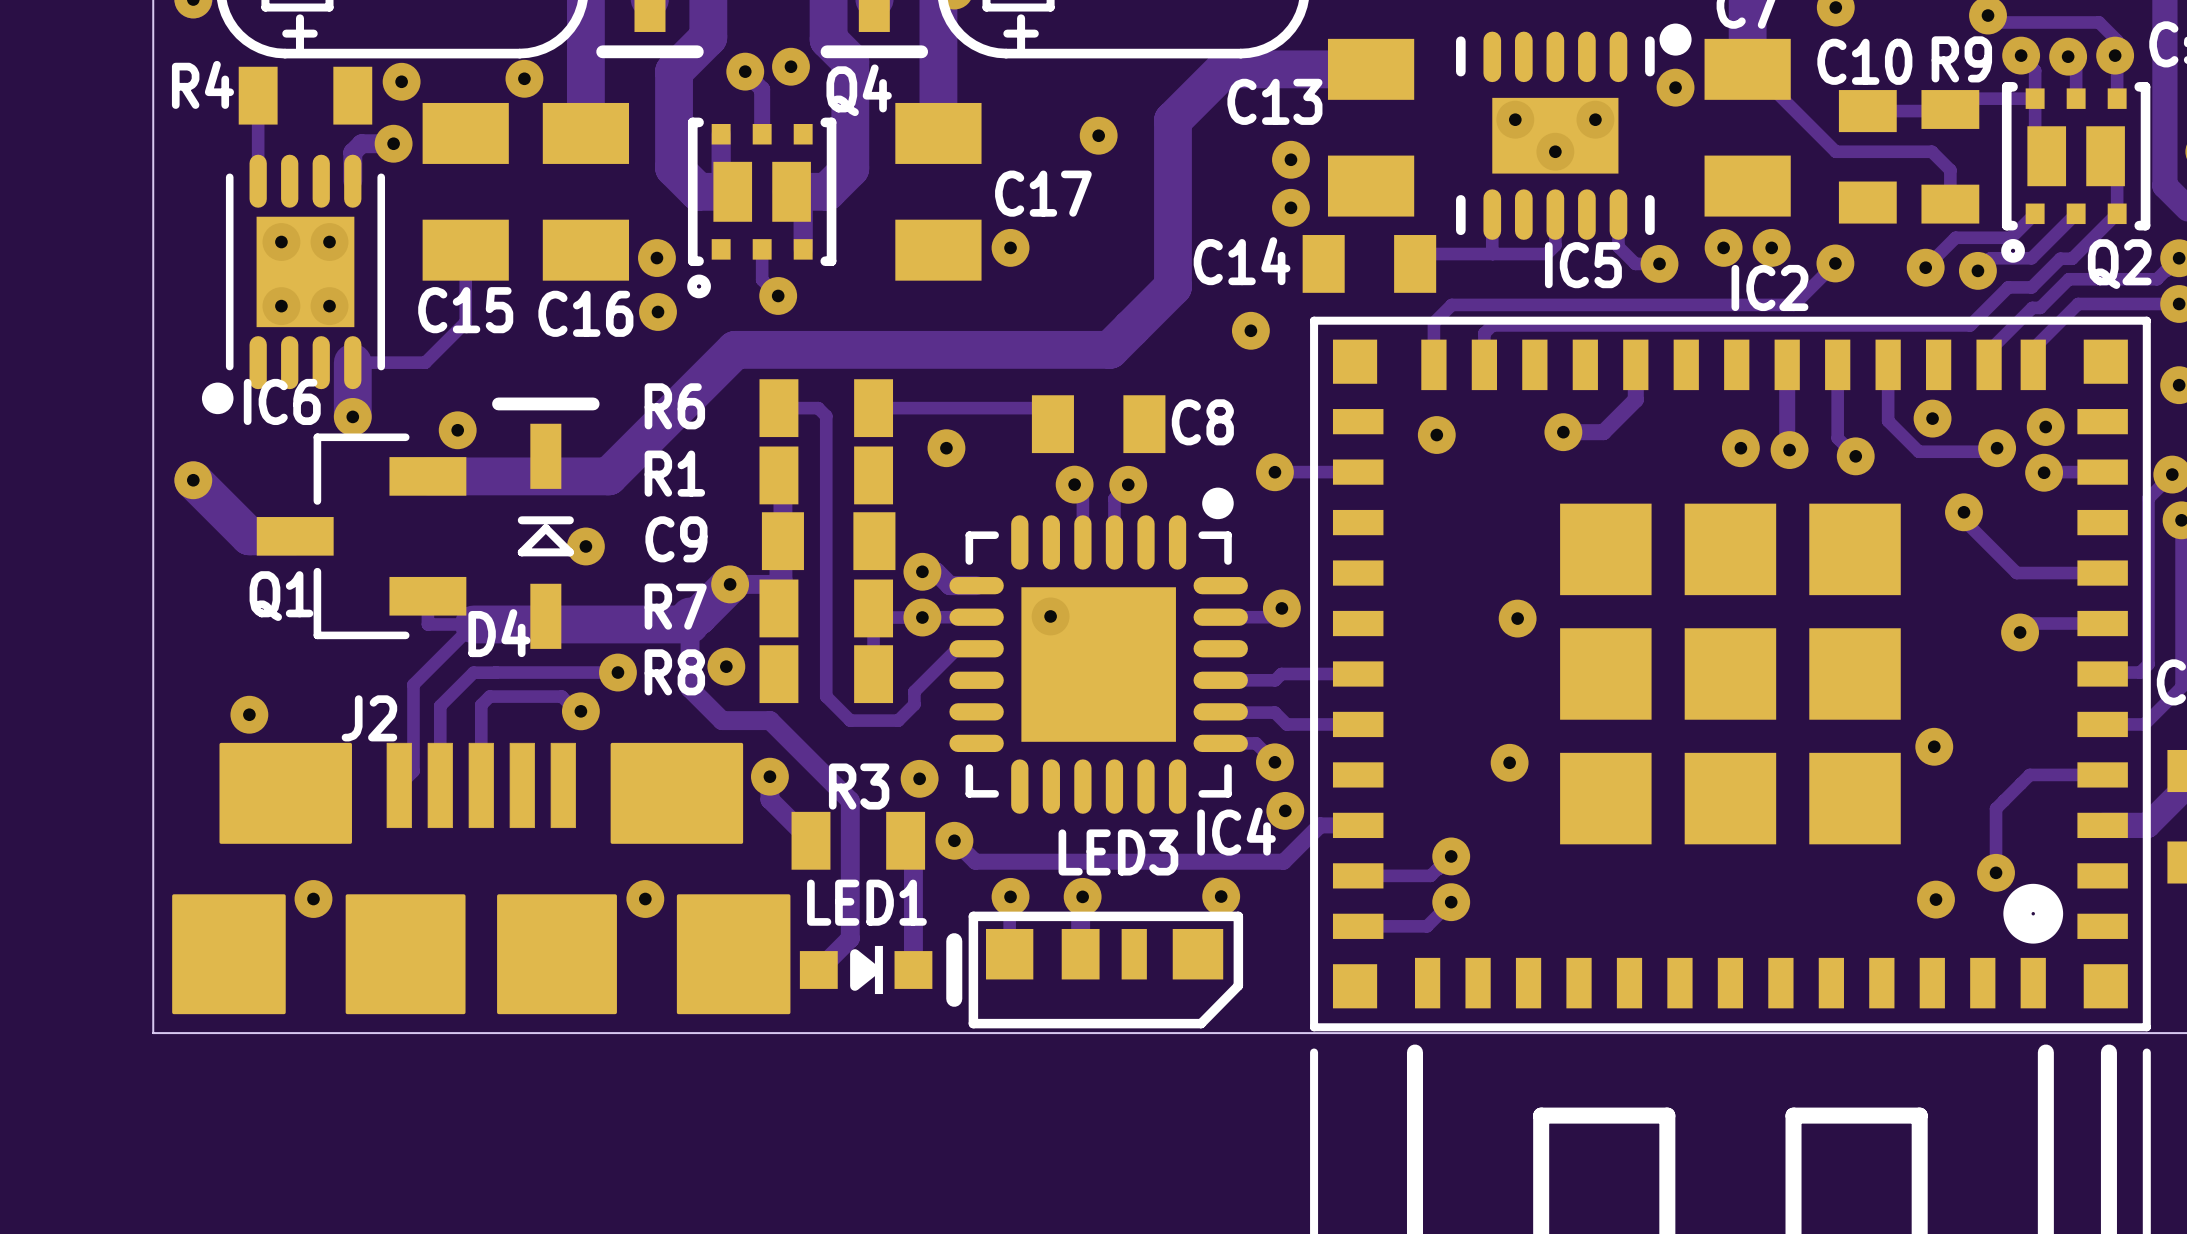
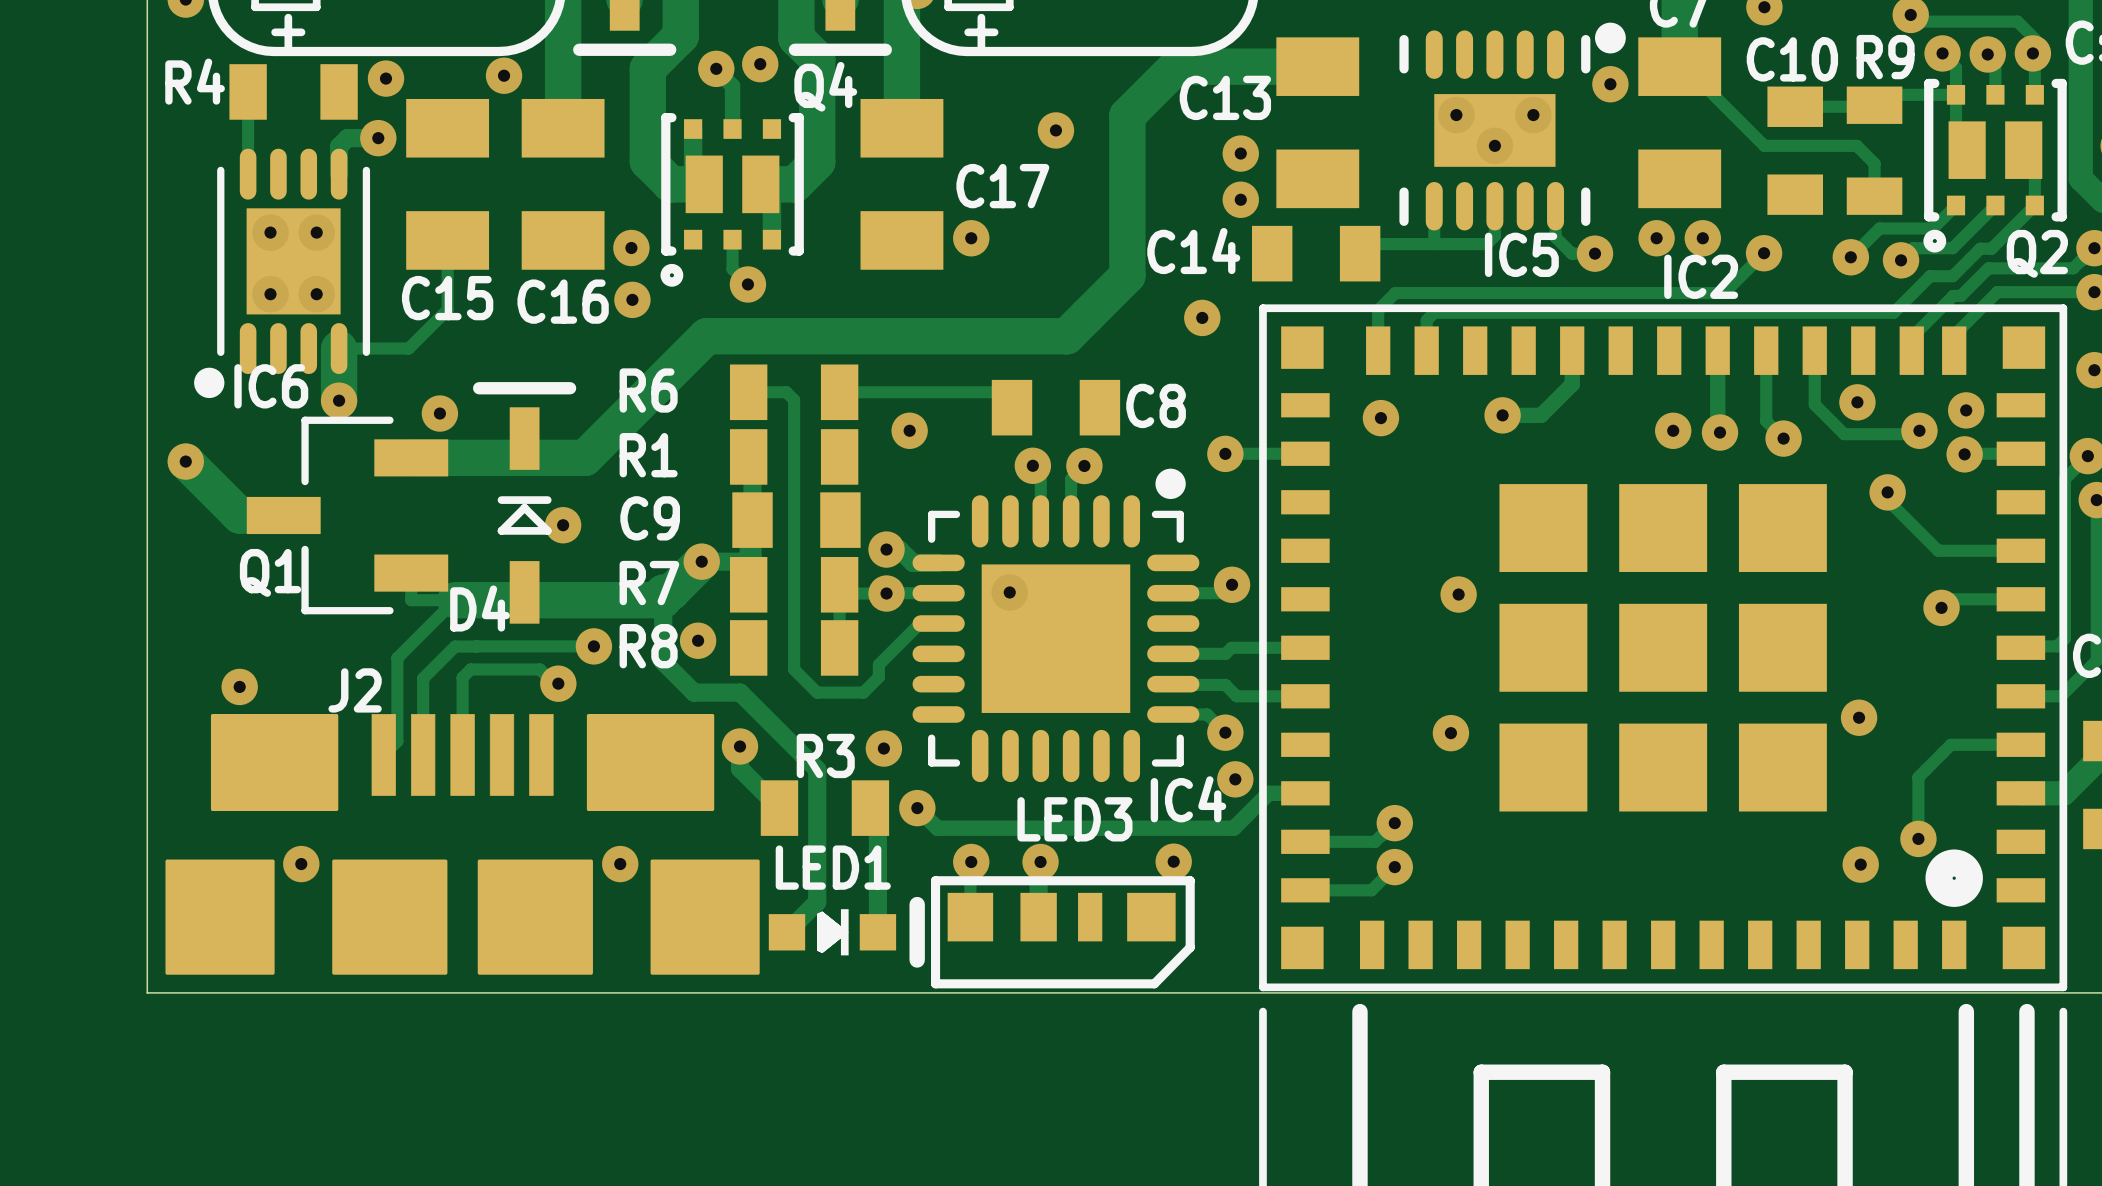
LED1 footprint: [799, 933, 963, 1007] -> [768, 896, 925, 968]

